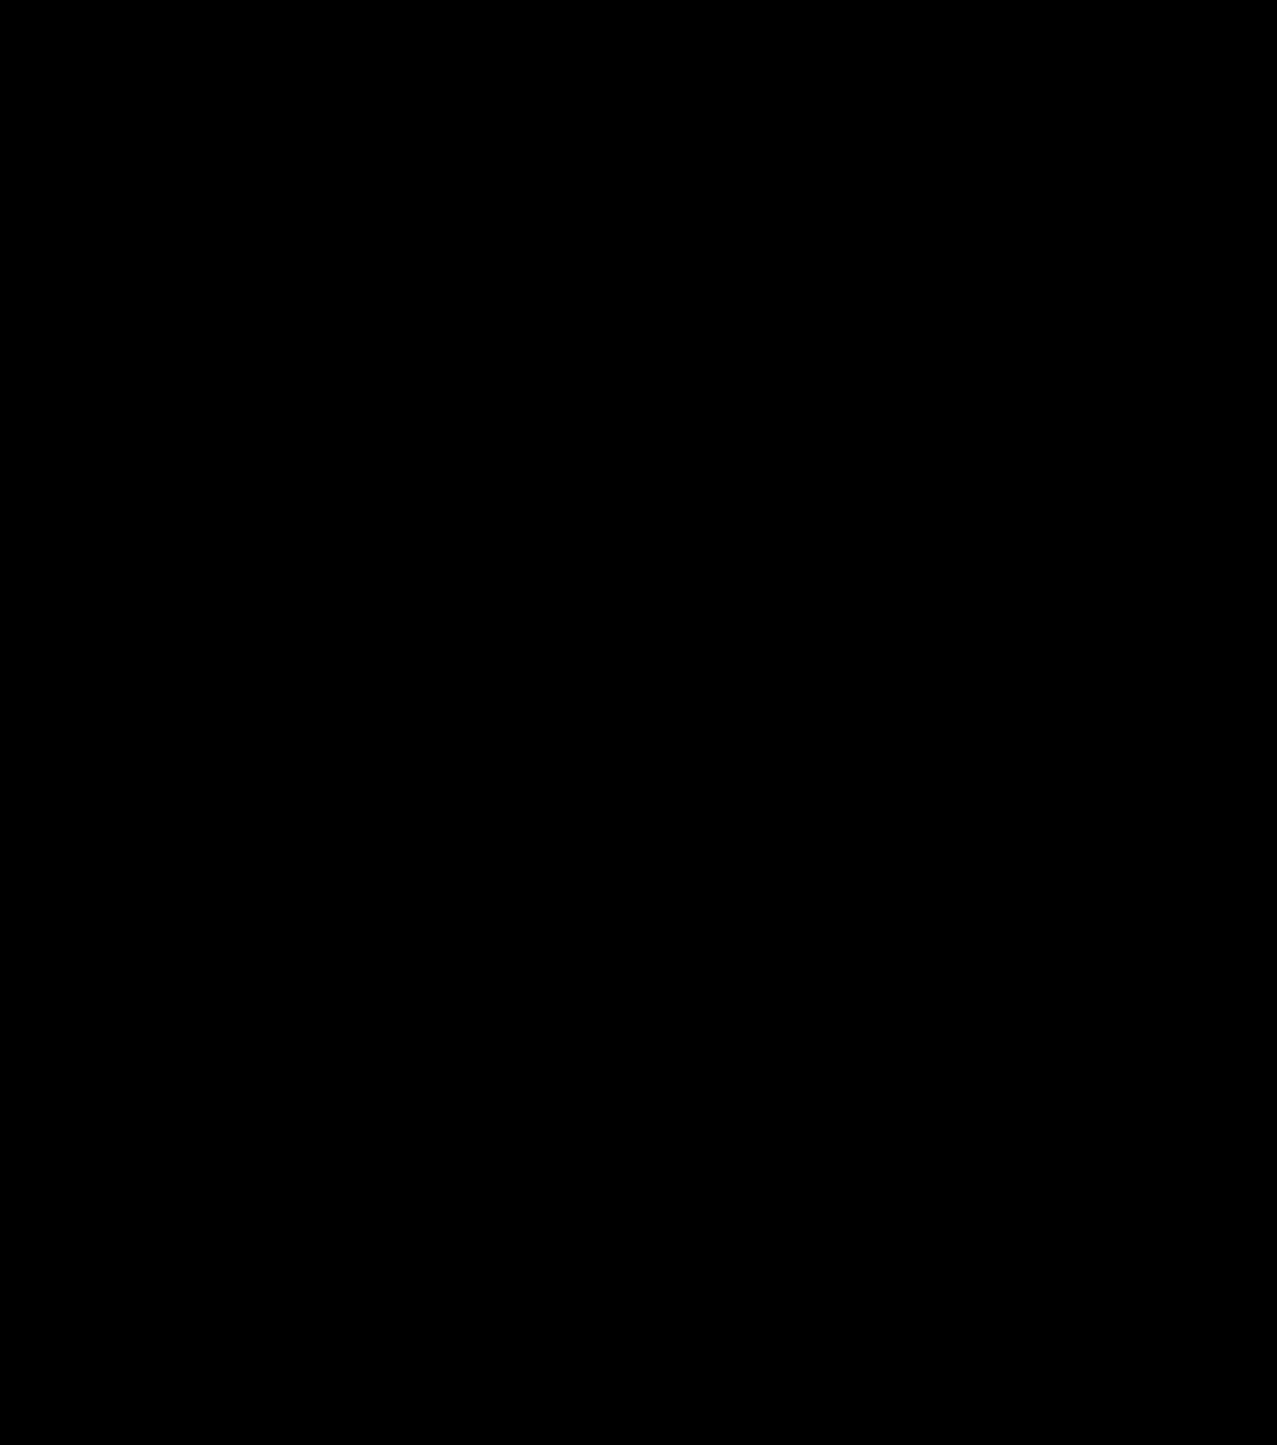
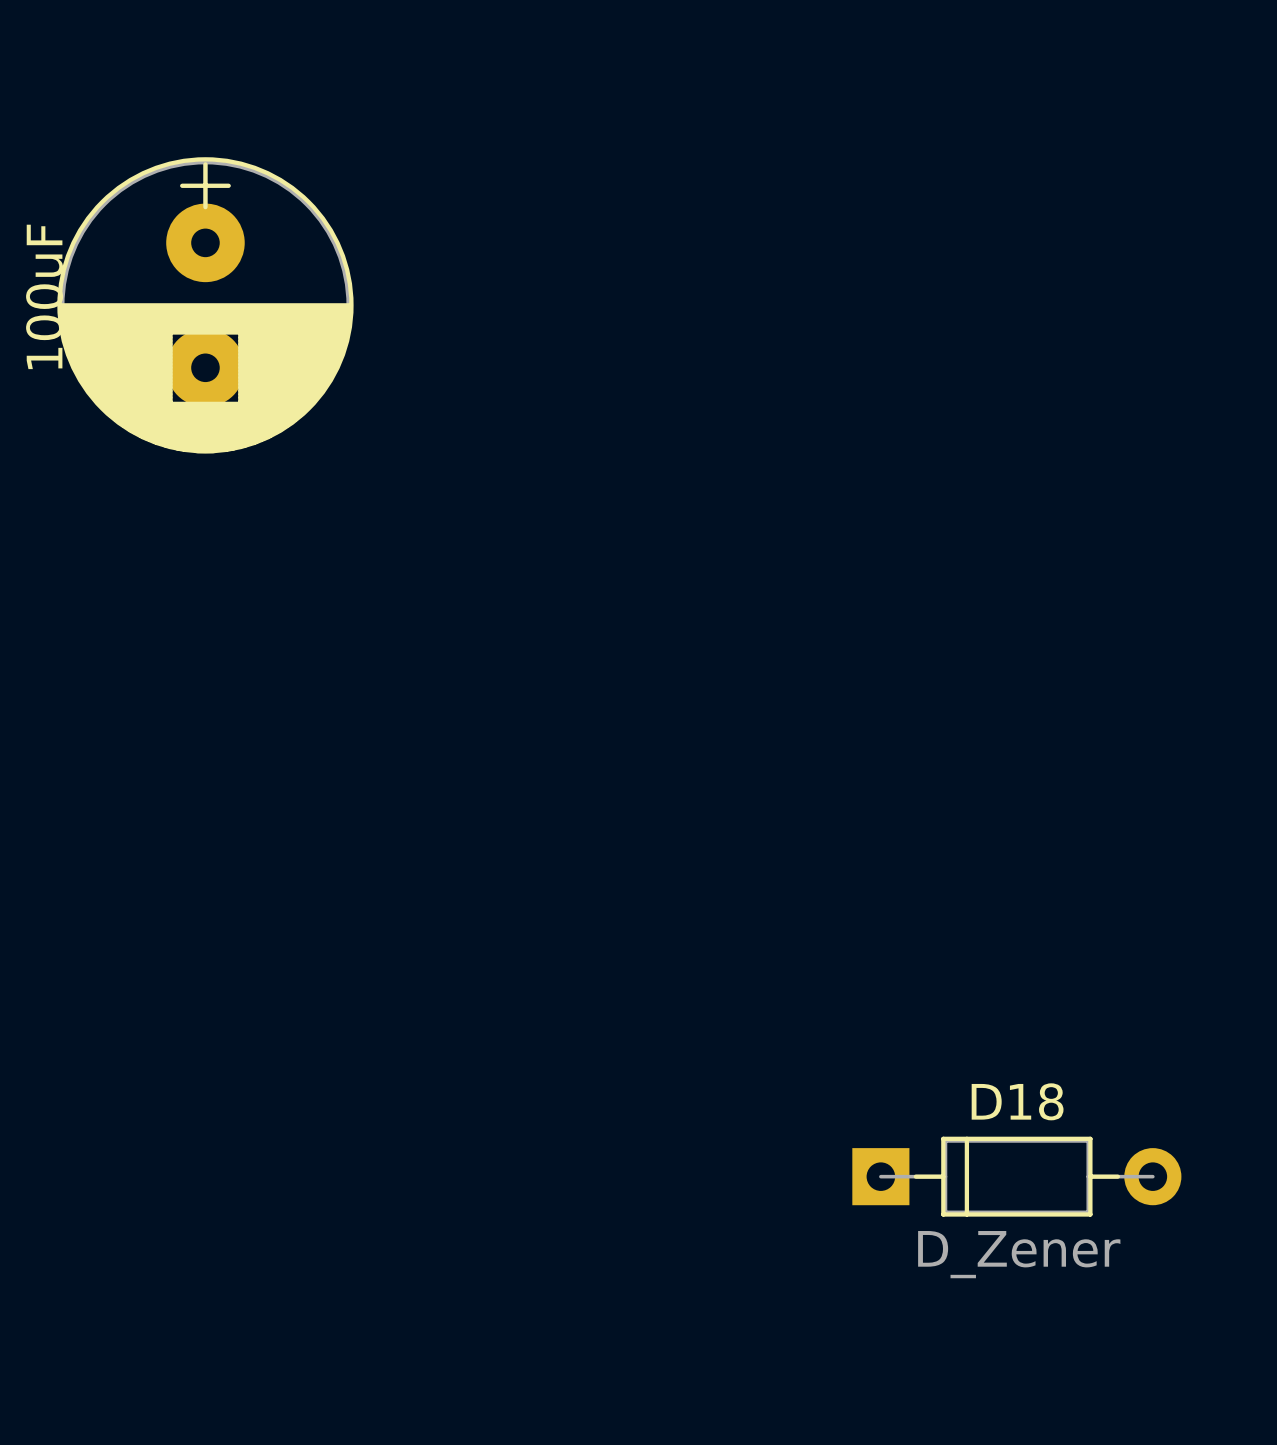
part: none -> 100uF (205, 305)
D18: none -> D_Zener (1016, 1176)

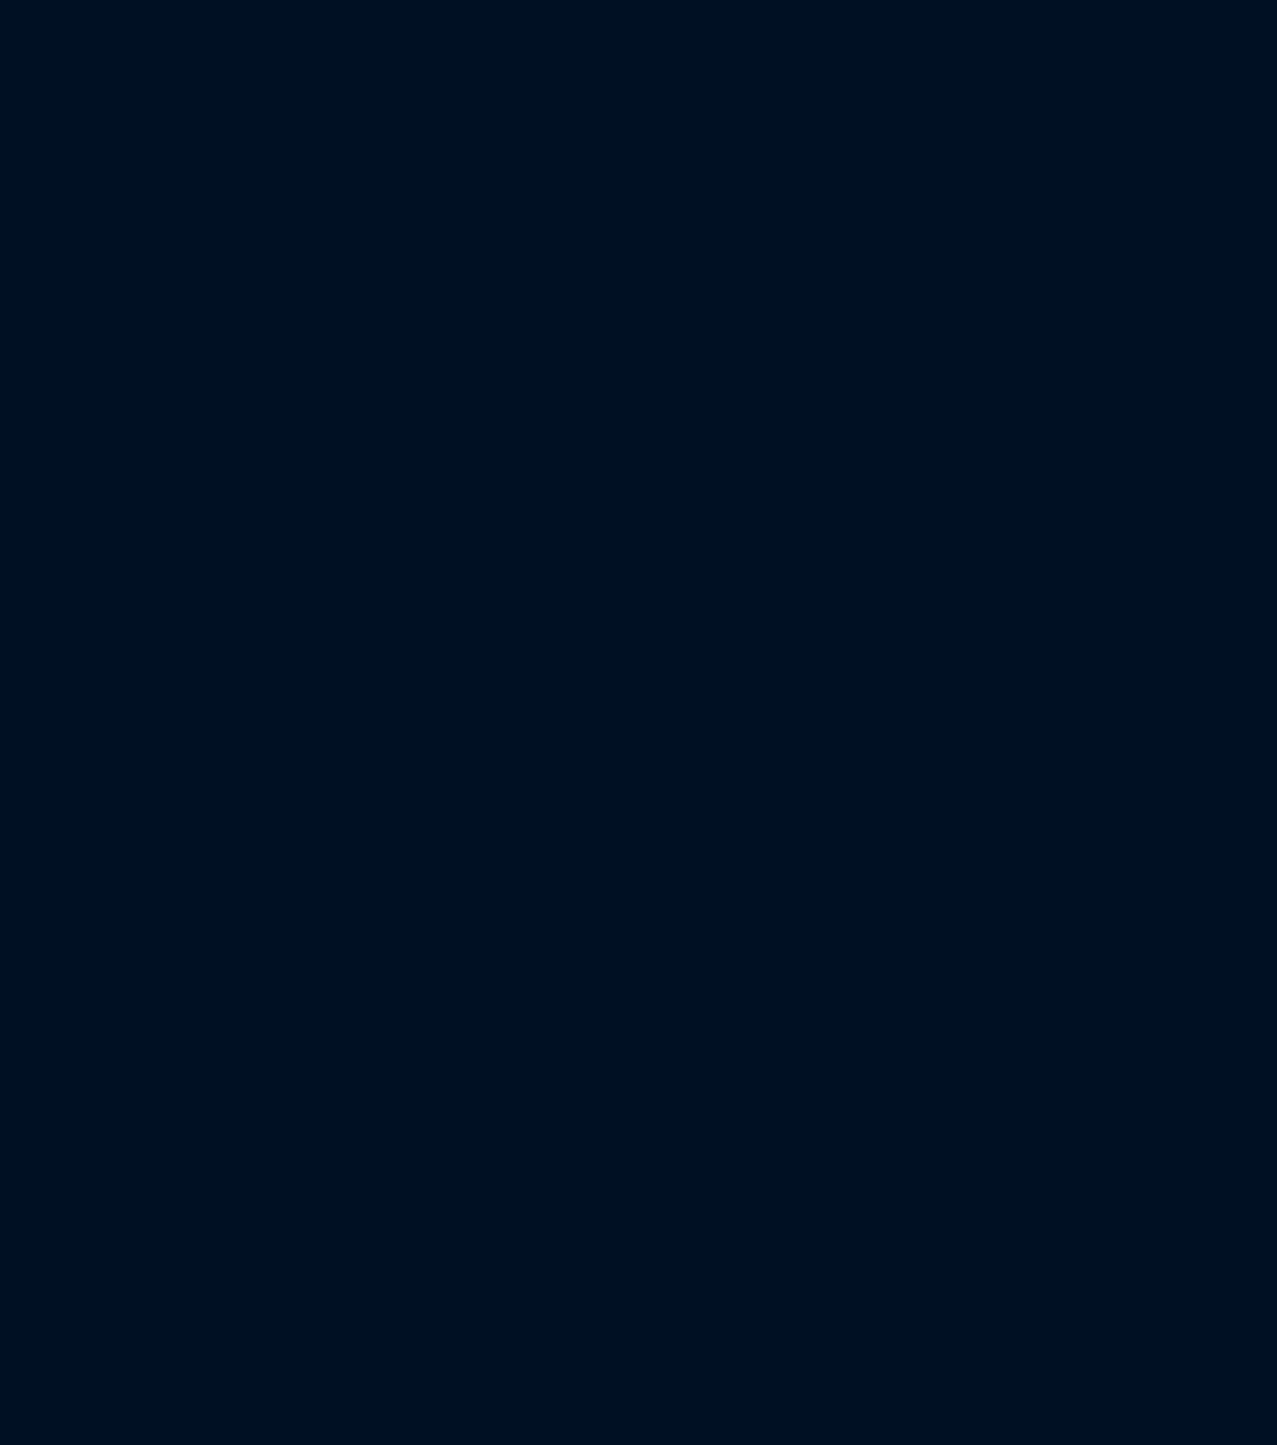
part: 100uF (205, 305) -> none
D18: D_Zener (1016, 1176) -> none

